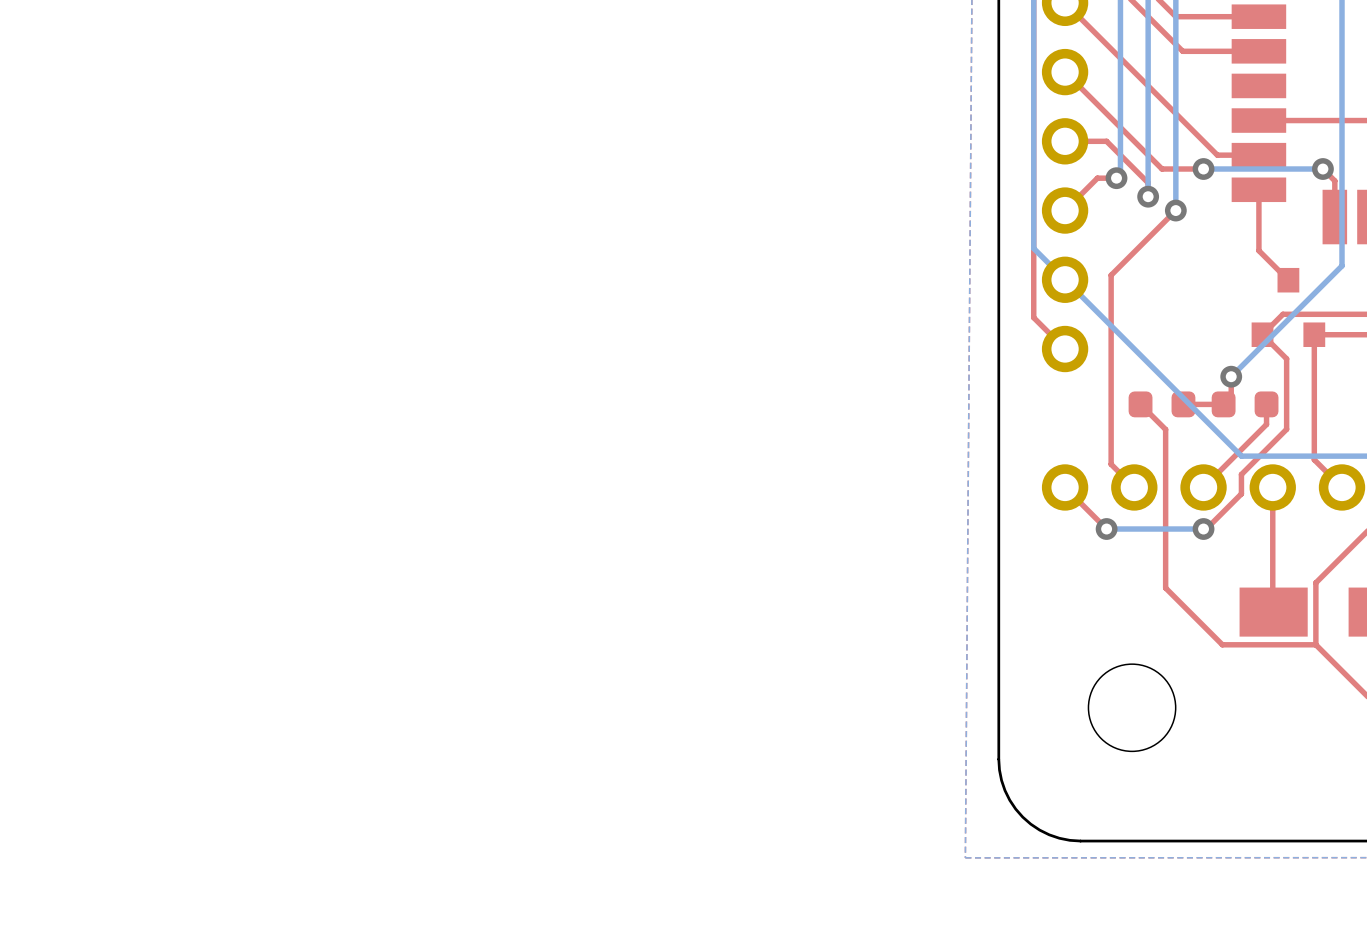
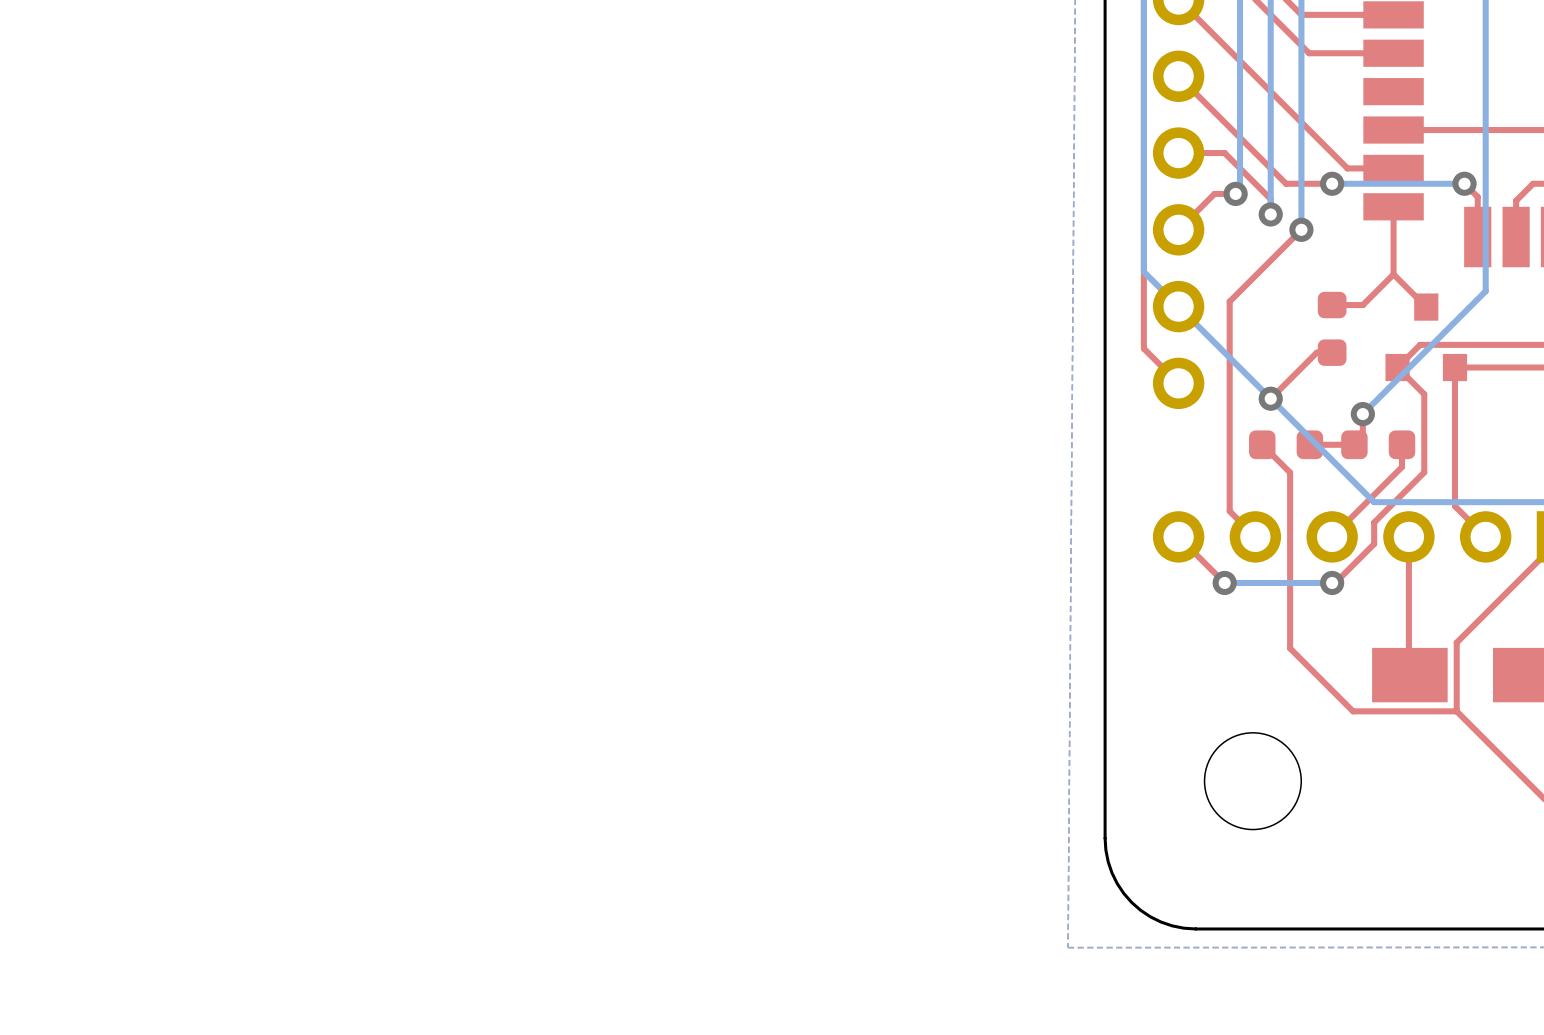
top track: none -> (1393, 274) (1362, 305) (1332, 305)
part: none -> (1332, 328)
top track: none -> (1332, 352) (1316, 352) (1270, 398)
via: none -> (1270, 398)

